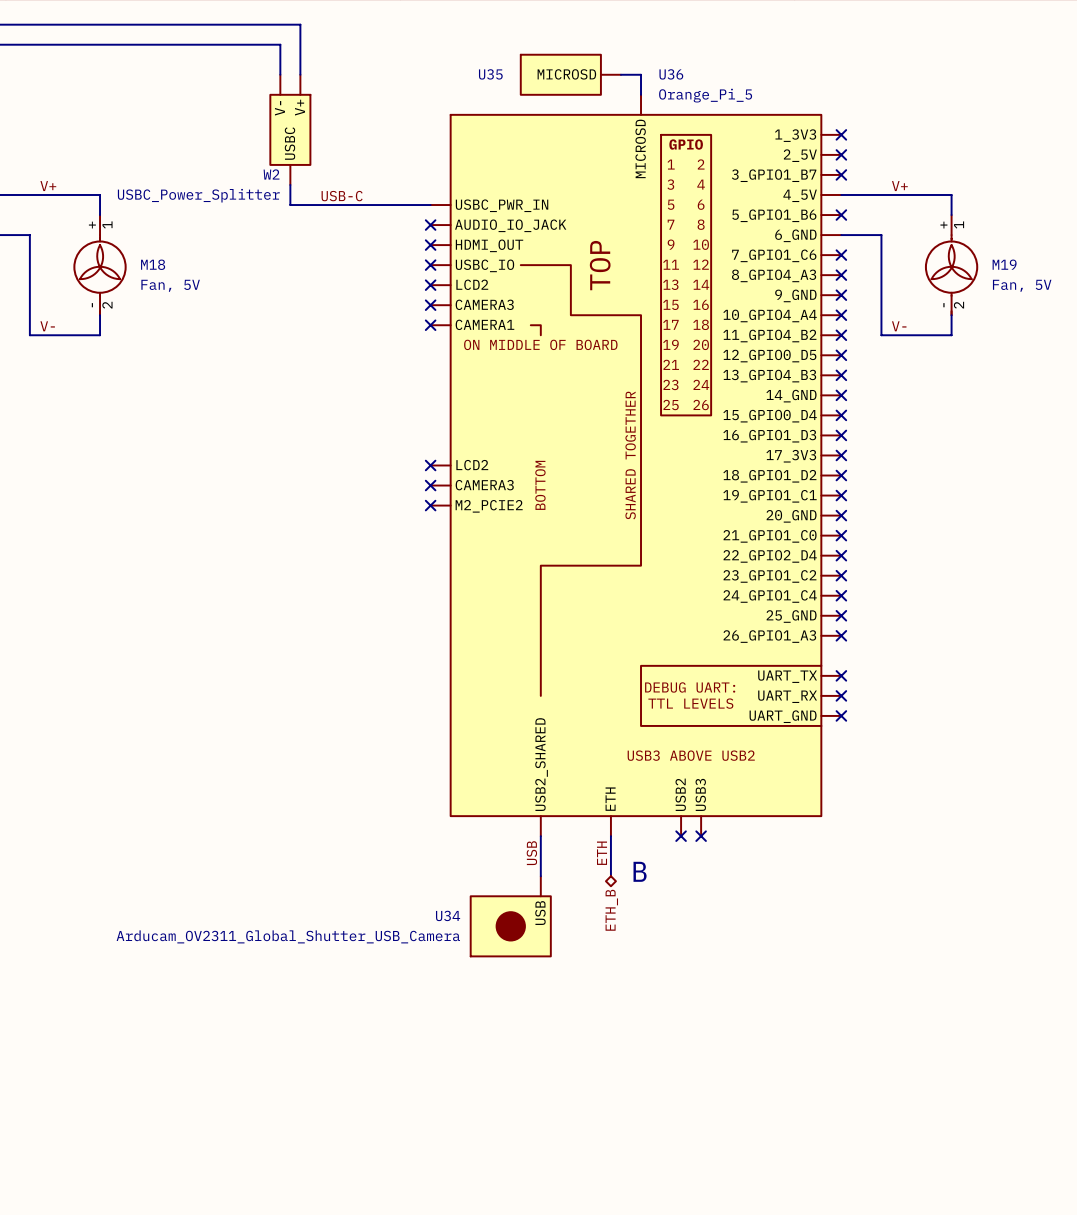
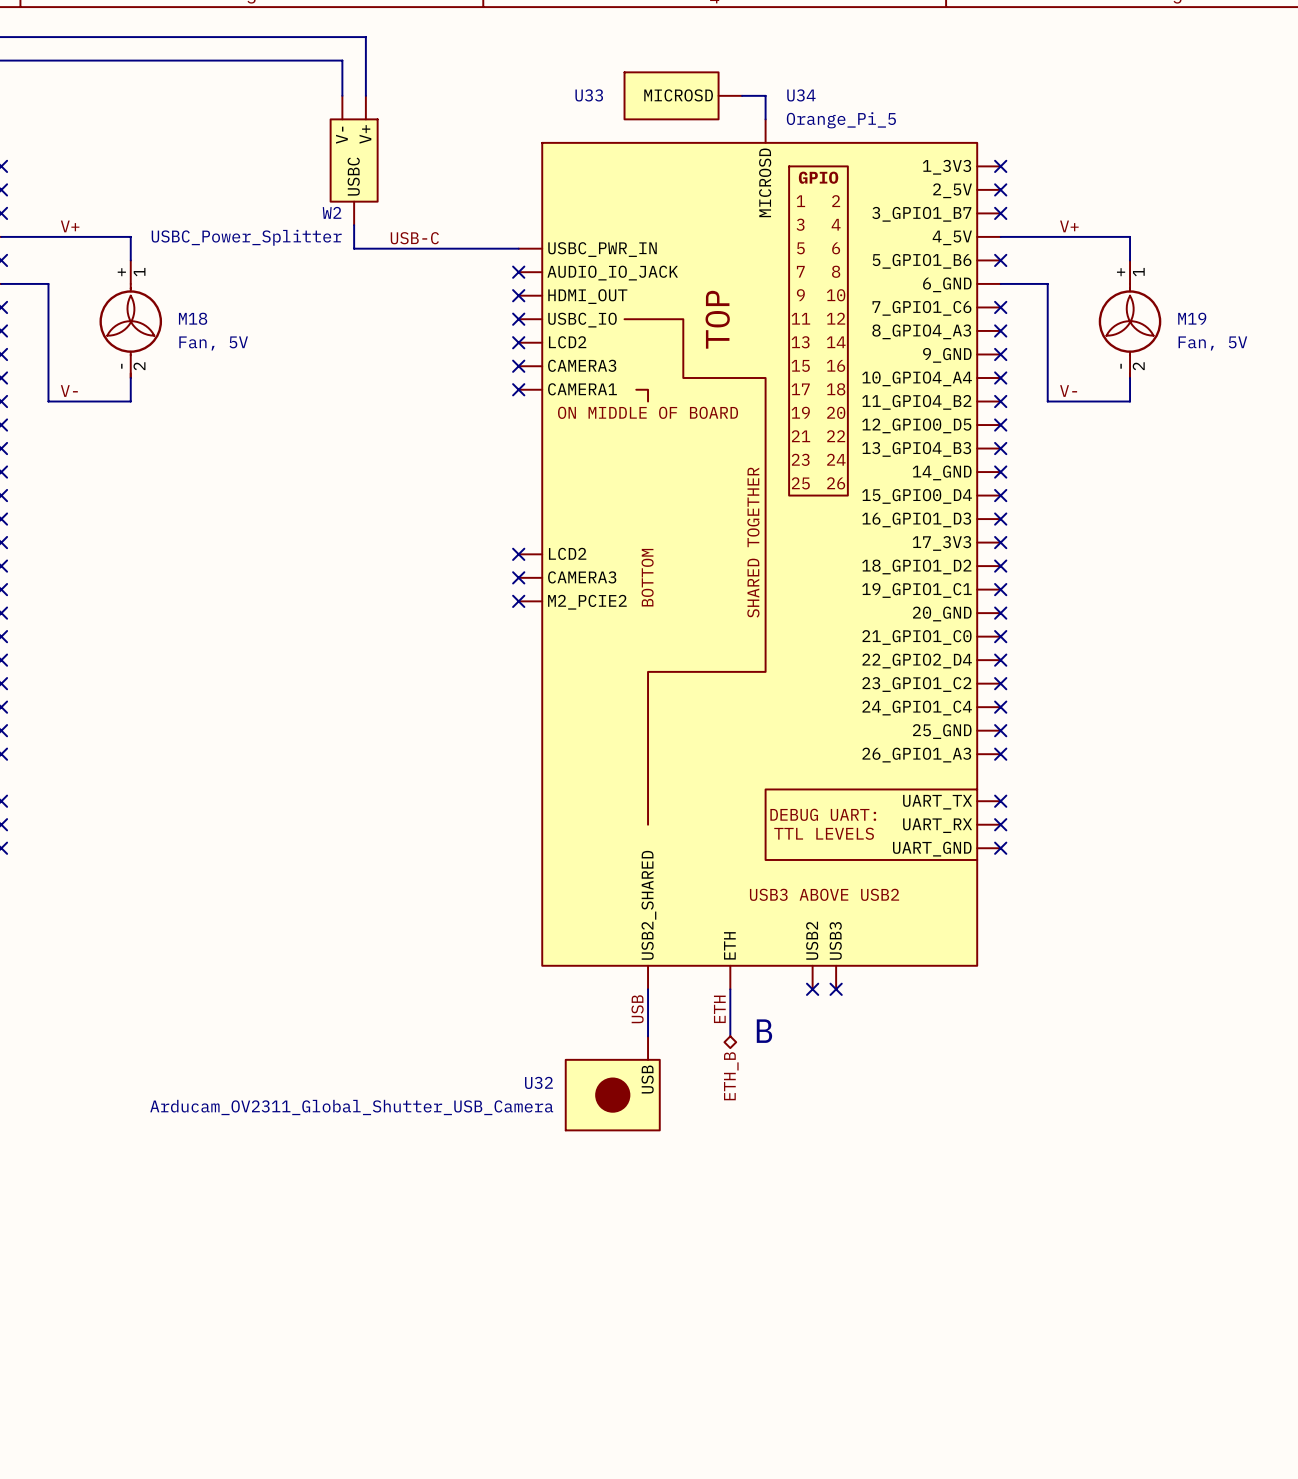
U35 name: U35 (490, 74) -> U33 (589, 95)
U36 name: U36 (671, 74) -> U34 (801, 95)
U34 name: U34 (448, 915) -> U32 (538, 1082)

